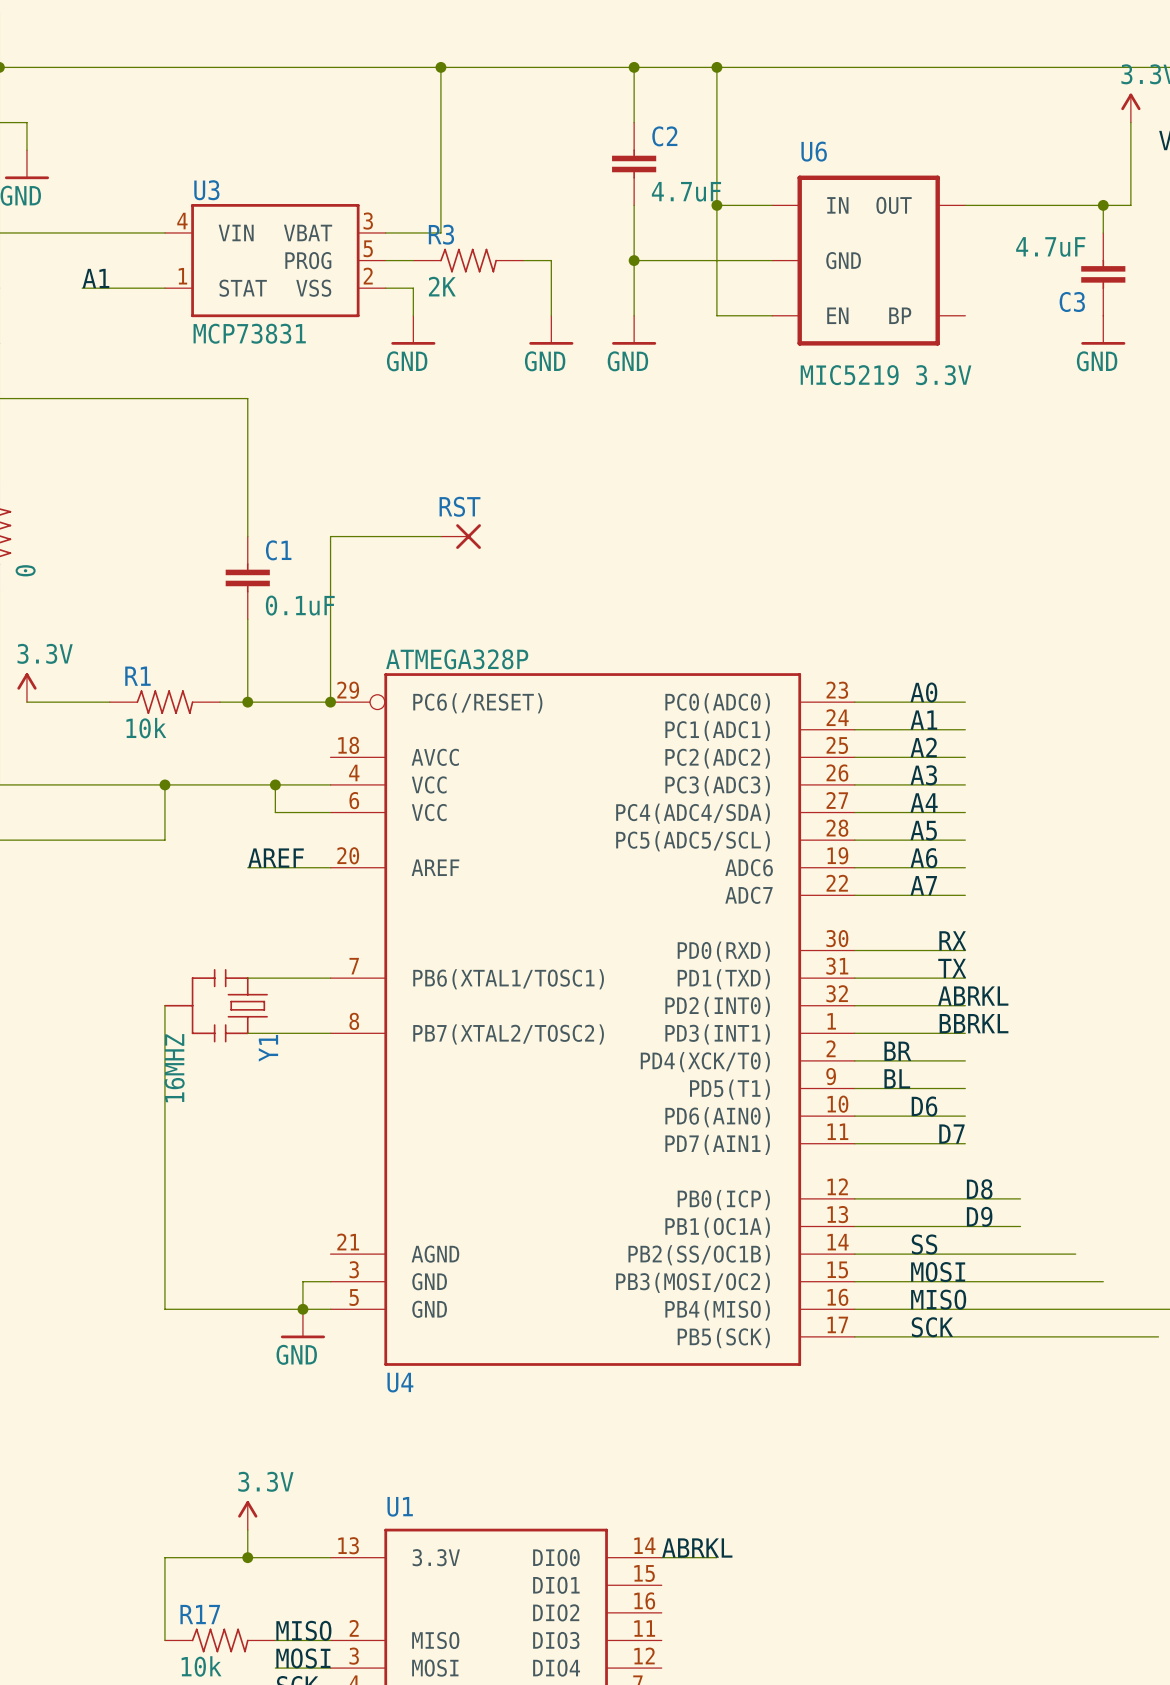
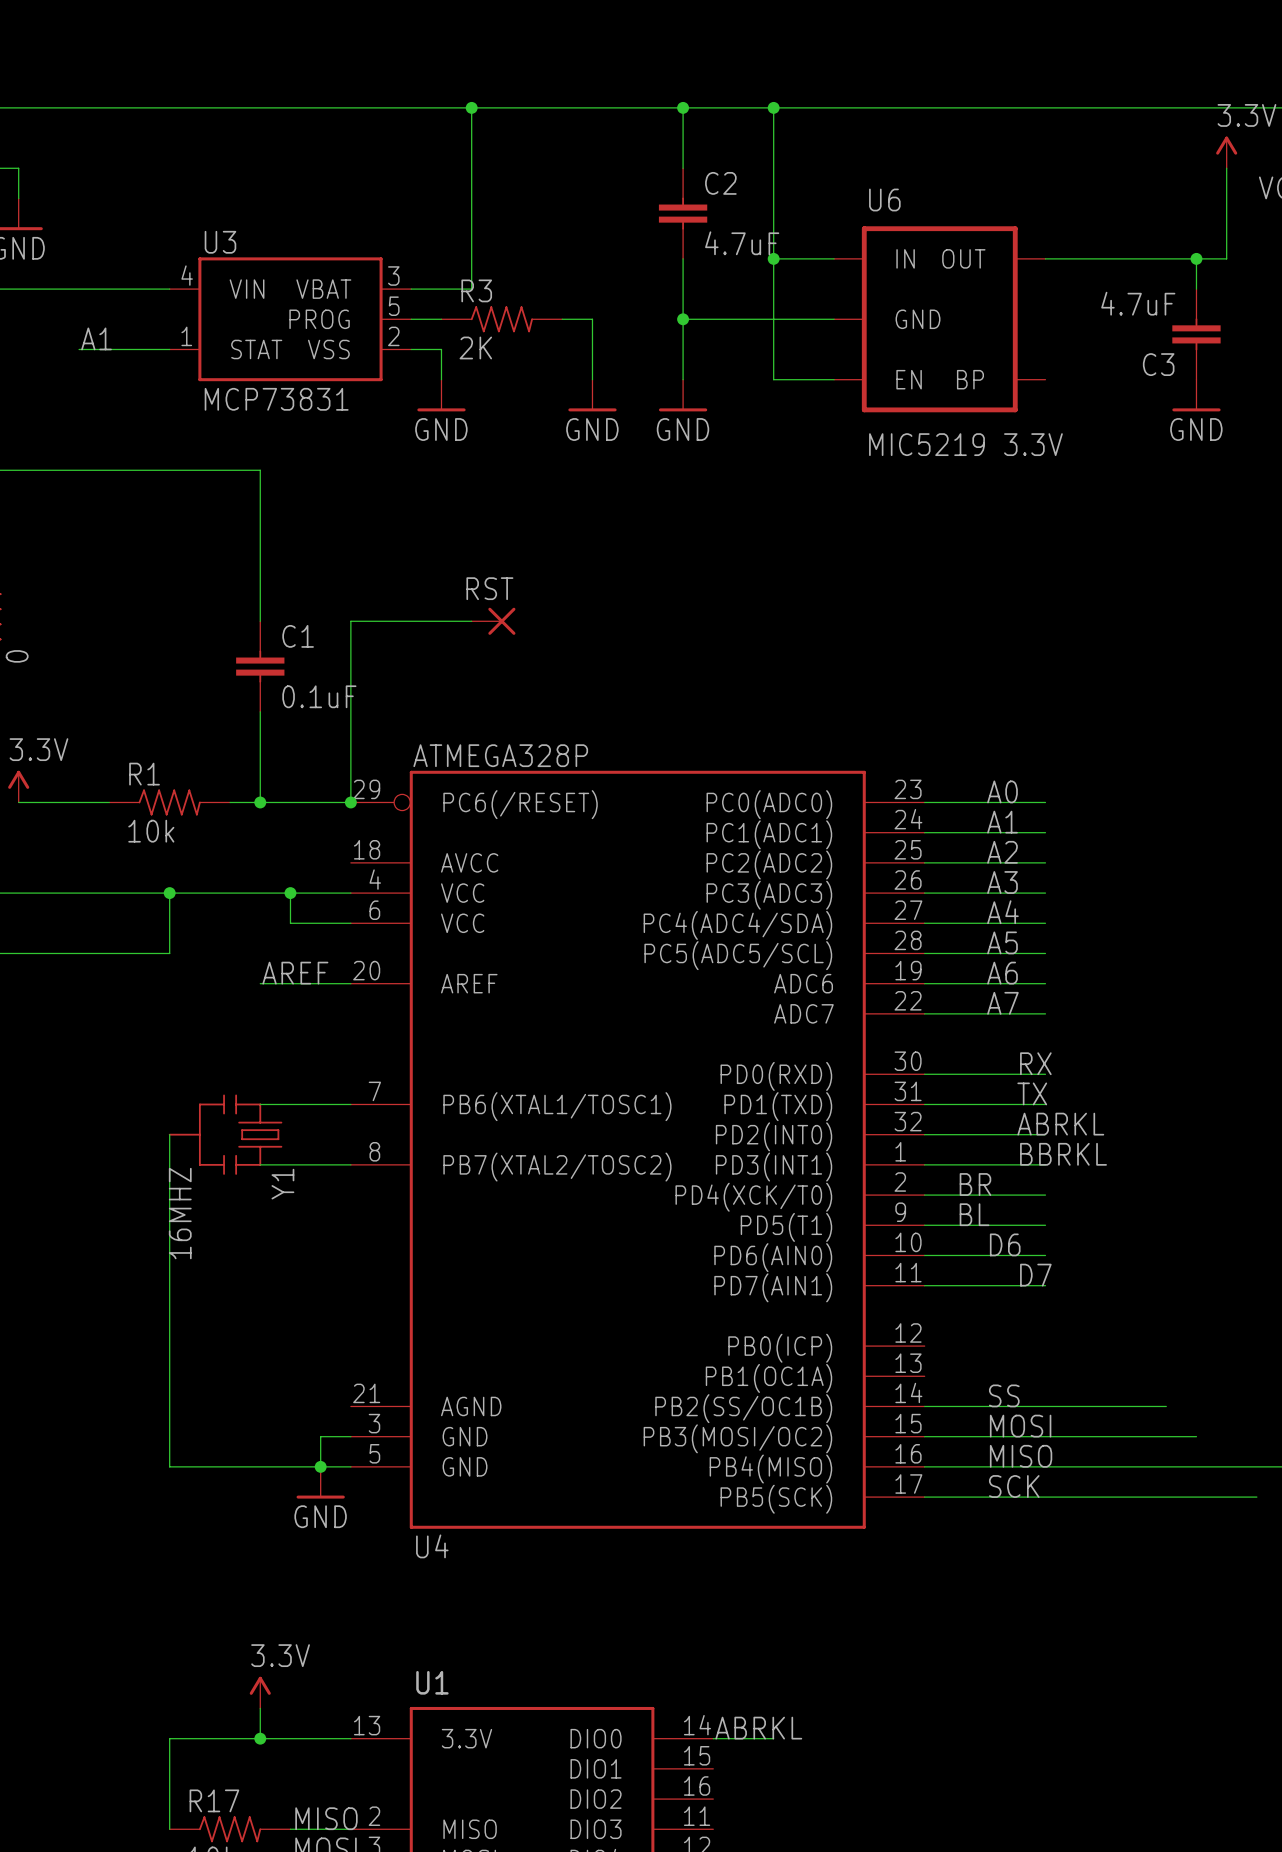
label: D8 (979, 1189) -> none
wire: (854, 1198) (1020, 1198) -> none
label: D9 (979, 1216) -> none
wire: (854, 1226) (1020, 1226) -> none

